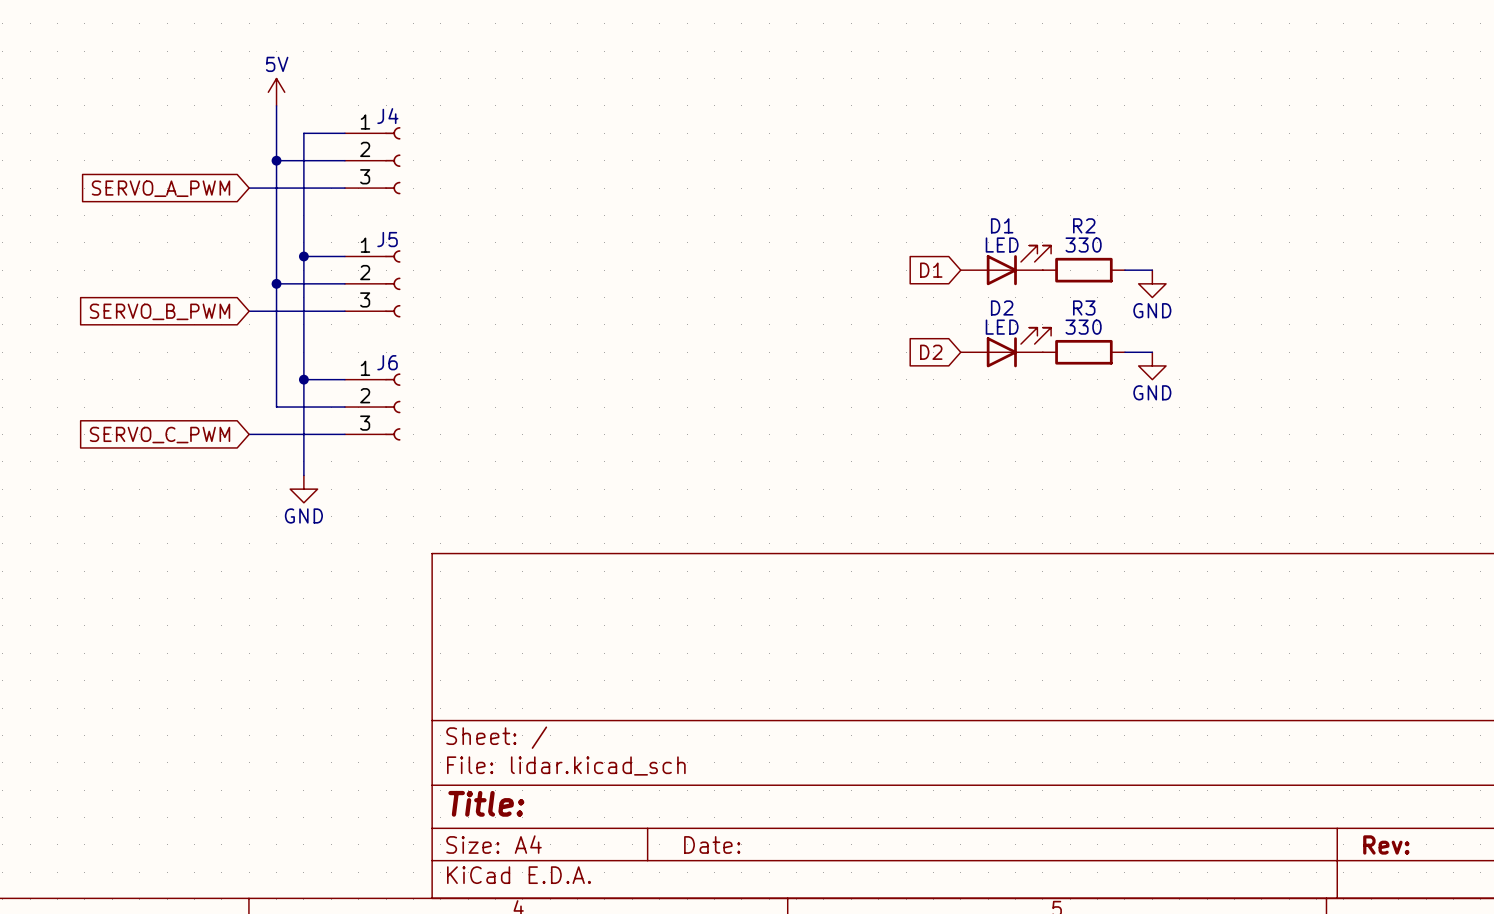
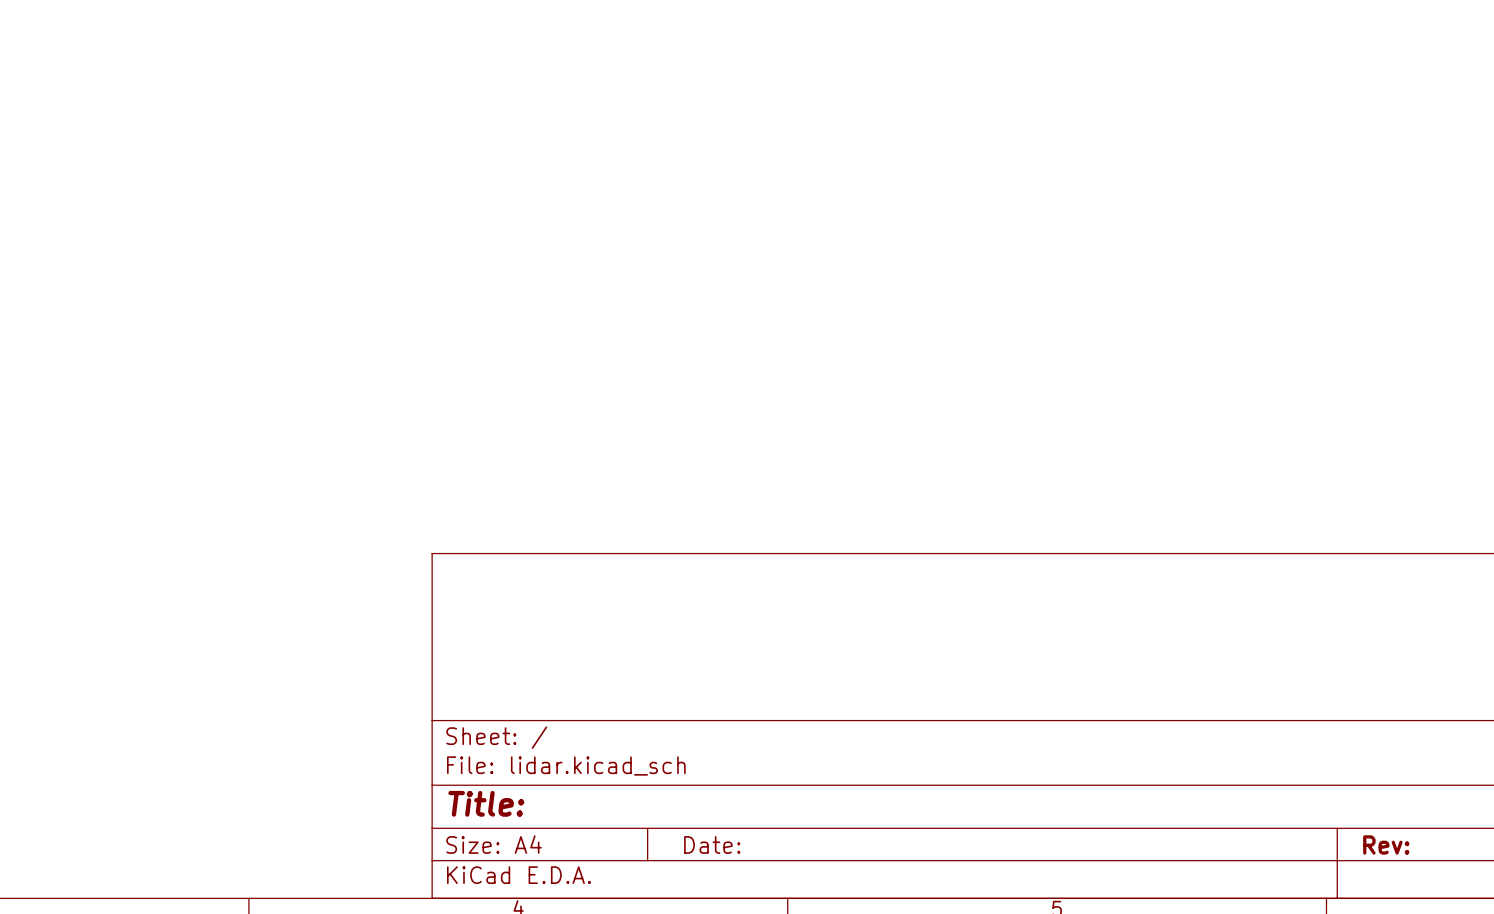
power symbol: 5V (276, 92) -> none
wire: (276, 105) (276, 407) (344, 407) -> none
wire: (344, 133) (303, 133) (303, 475) -> none
wire: (276, 160) (344, 160) -> none
junction: (276, 160) -> none
J4: (372, 160) -> none
global label: SERVO_A_PWM (161, 188) -> none
wire: (249, 188) (344, 188) -> none
wire: (303, 256) (344, 256) -> none
junction: (303, 256) -> none
D1: LED (1005, 265) -> none
global label: D1 (931, 270) -> none
R2: 330 (1083, 270) -> none
wire: (1124, 270) (1152, 270) -> none
wire: (276, 283) (344, 283) -> none
junction: (276, 283) -> none
J5: (372, 283) -> none
power symbol: GND (1152, 283) -> none
global label: SERVO_B_PWM (160, 311) -> none
wire: (249, 311) (344, 311) -> none
D2: LED (1005, 347) -> none
global label: D2 (931, 352) -> none
R3: 330 (1083, 352) -> none
wire: (1124, 352) (1152, 352) -> none
power symbol: GND (1152, 365) -> none
wire: (303, 379) (344, 379) -> none
junction: (303, 379) -> none
J6: (372, 407) -> none
wire: (249, 434) (344, 434) -> none
global label: SERVO_C_PWM (160, 435) -> none
power symbol: GND (303, 489) -> none

